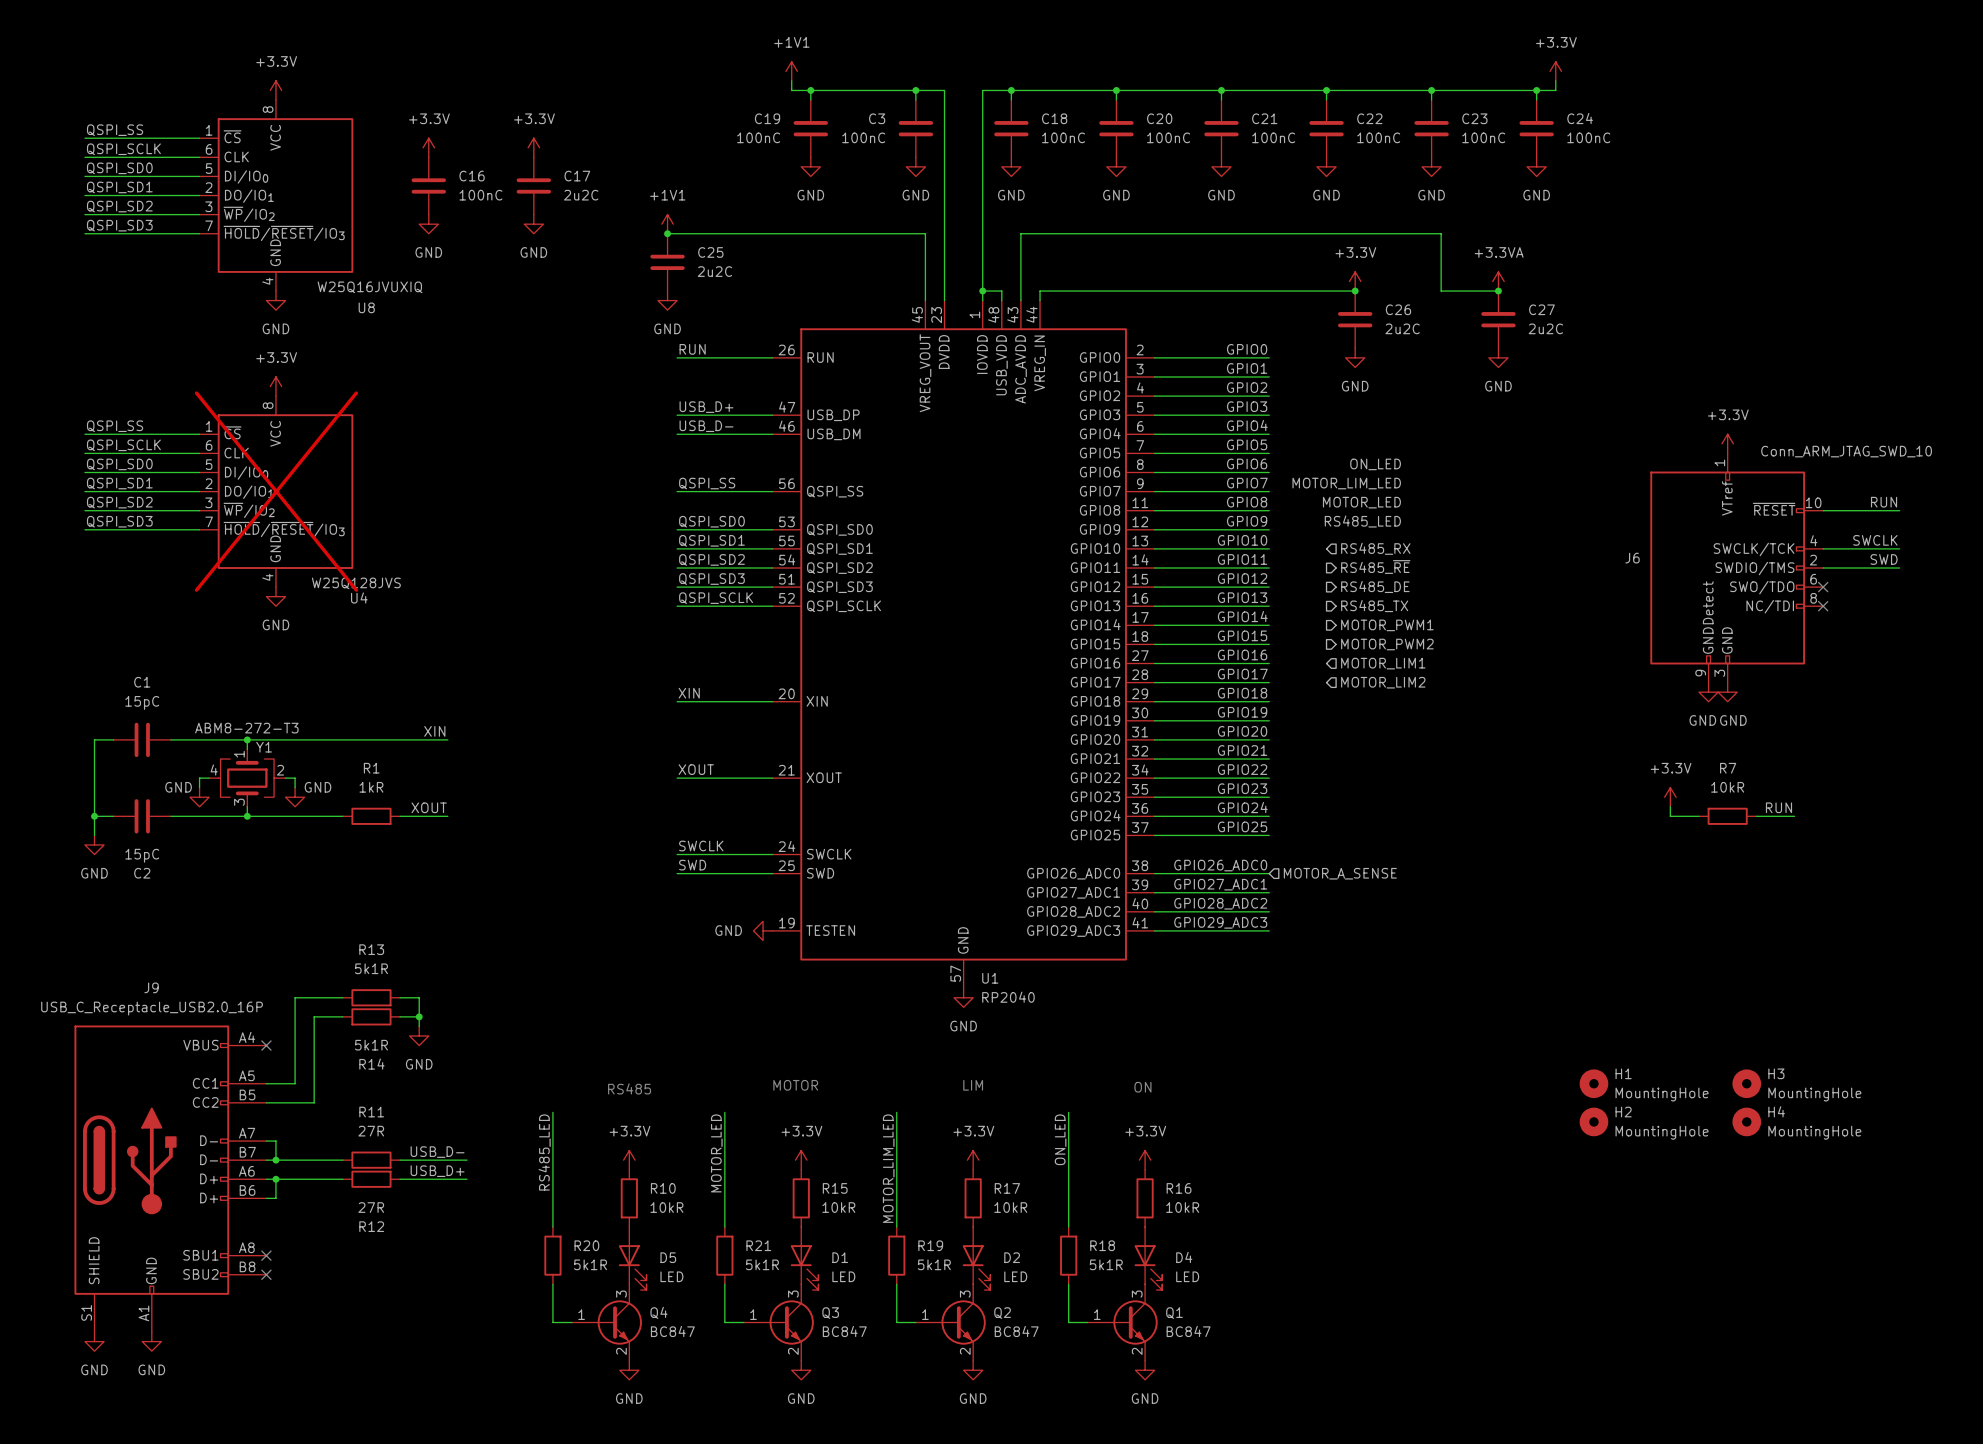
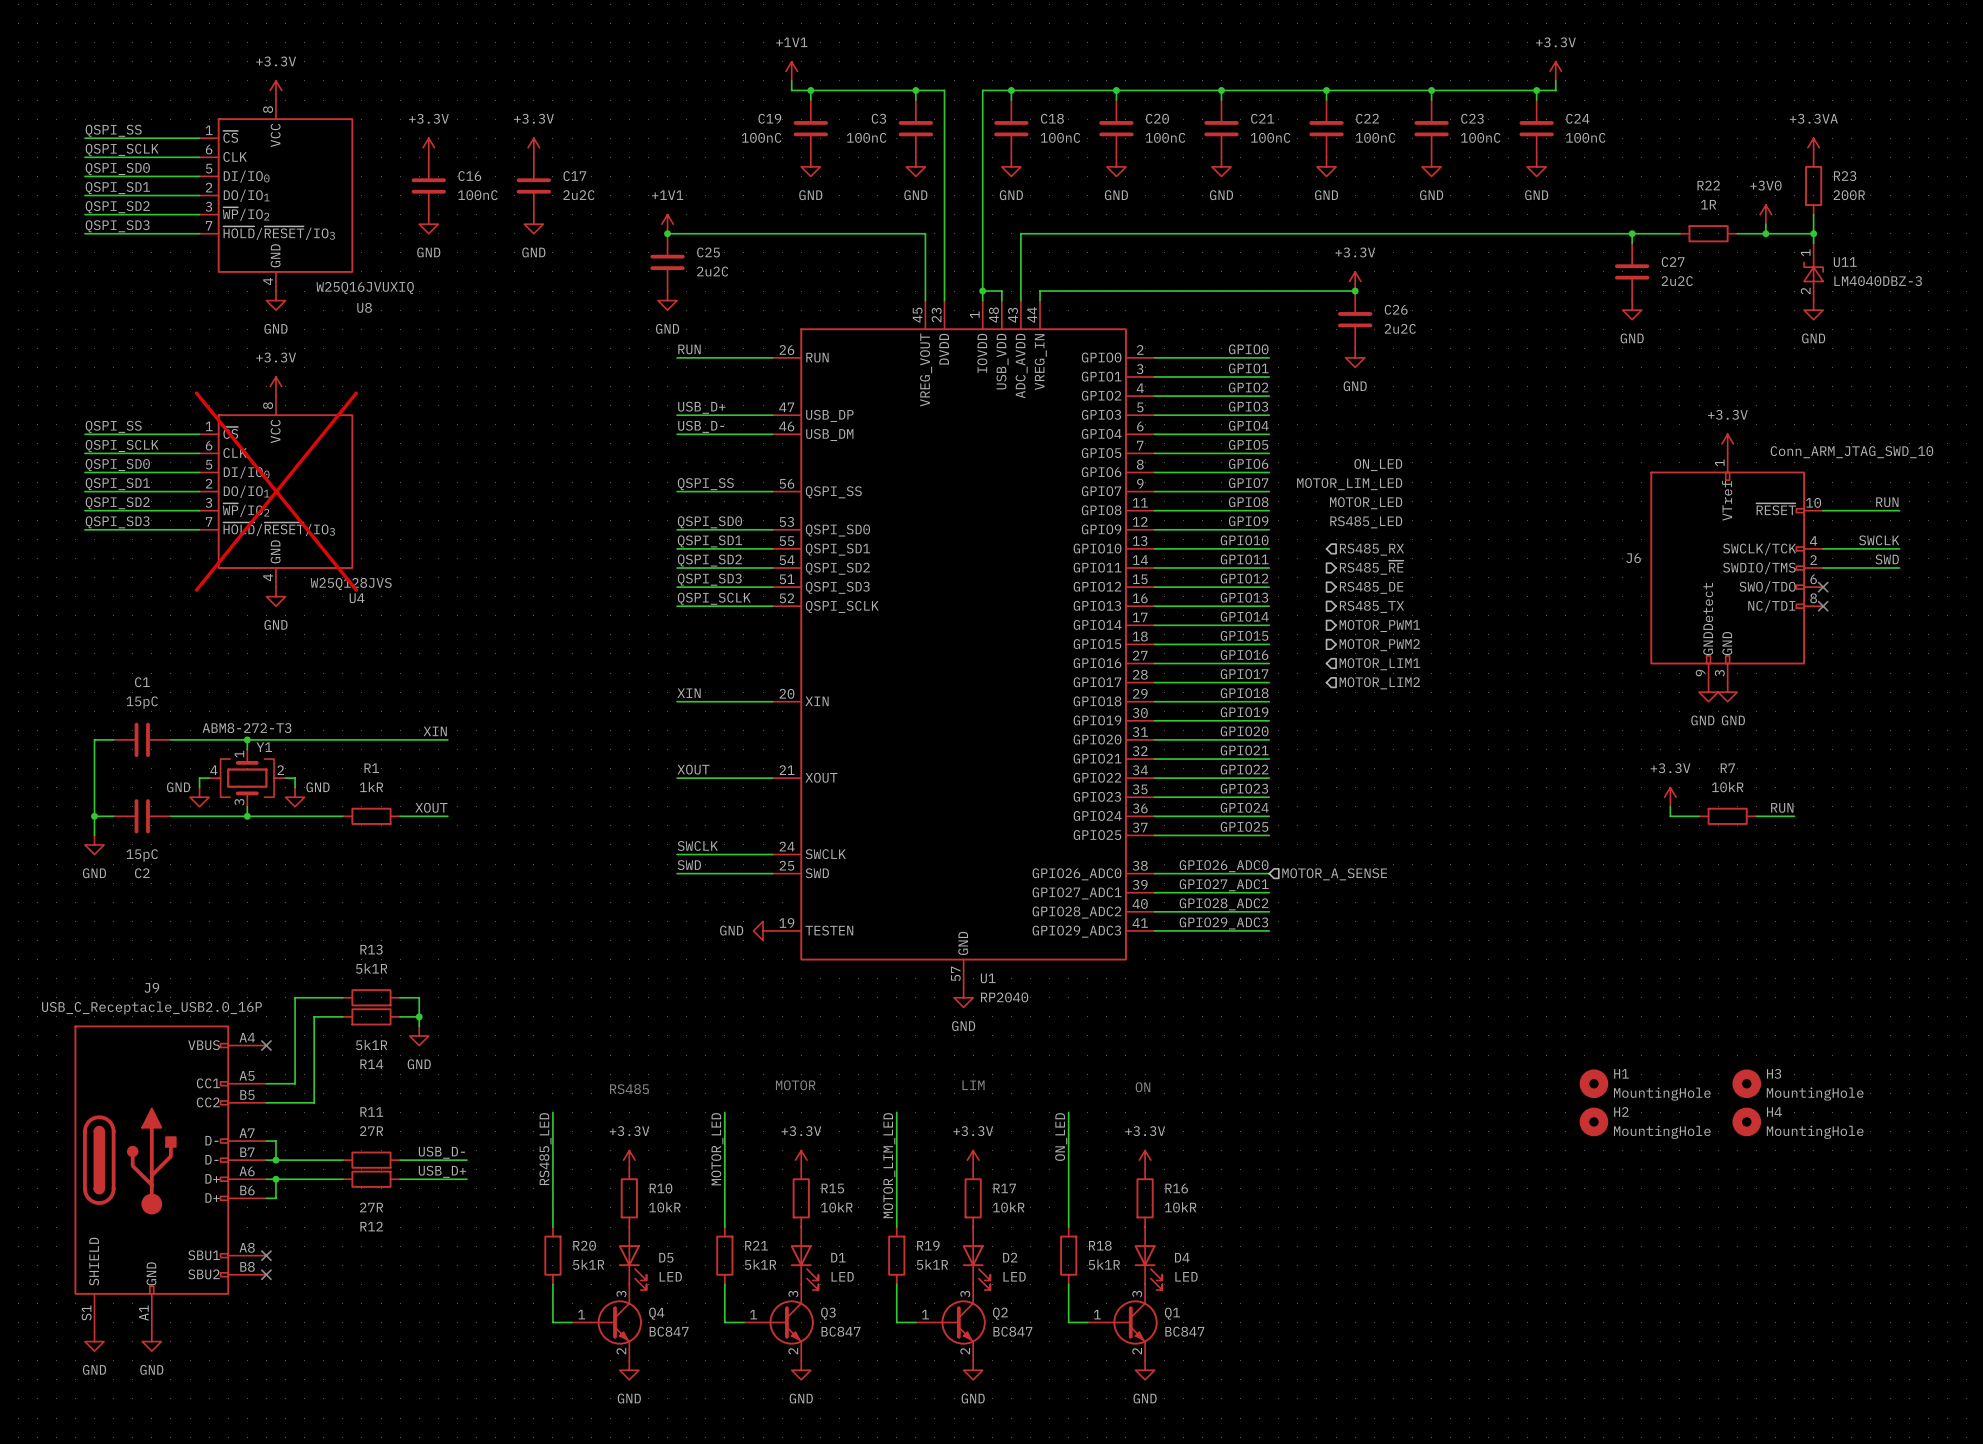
power symbol: none -> +3.3VA (1813, 147)
R23: none -> 200R (1813, 185)
power symbol: none -> +3V0 (1765, 214)
wire: none -> (1813, 214) (1813, 243)
wire: none -> (1765, 224) (1765, 233)
wire: (1441, 233) (1441, 291) (1498, 291) -> (1441, 233) (1679, 233)
wire: none -> (1632, 233) (1632, 243)
junction: none -> (1632, 233)
R22: none -> 1R (1708, 233)
wire: none -> (1737, 233) (1813, 233)
junction: none -> (1765, 233)
junction: none -> (1813, 233)
U11: none -> LM4040DBZ-3 (1813, 271)
power symbol: +3.3VA (1498, 281) -> none
junction: (1498, 291) -> none
power symbol: none -> GND (1813, 310)
C27 position: (1498, 319) -> (1632, 271)
power symbol position: GND (1498, 357) -> GND (1632, 310)

